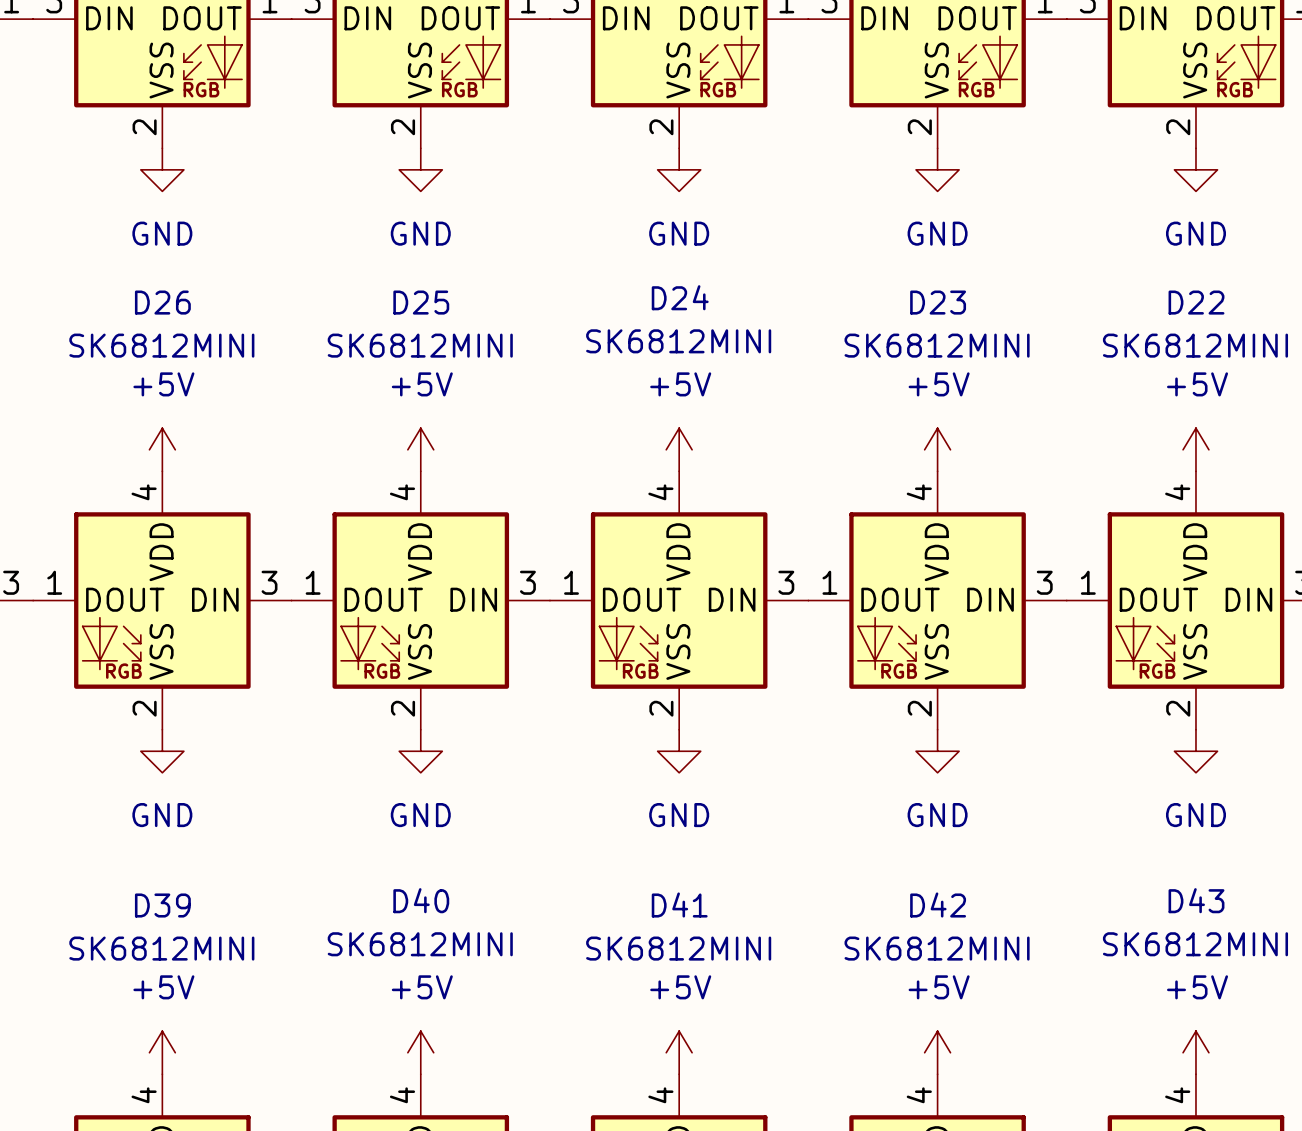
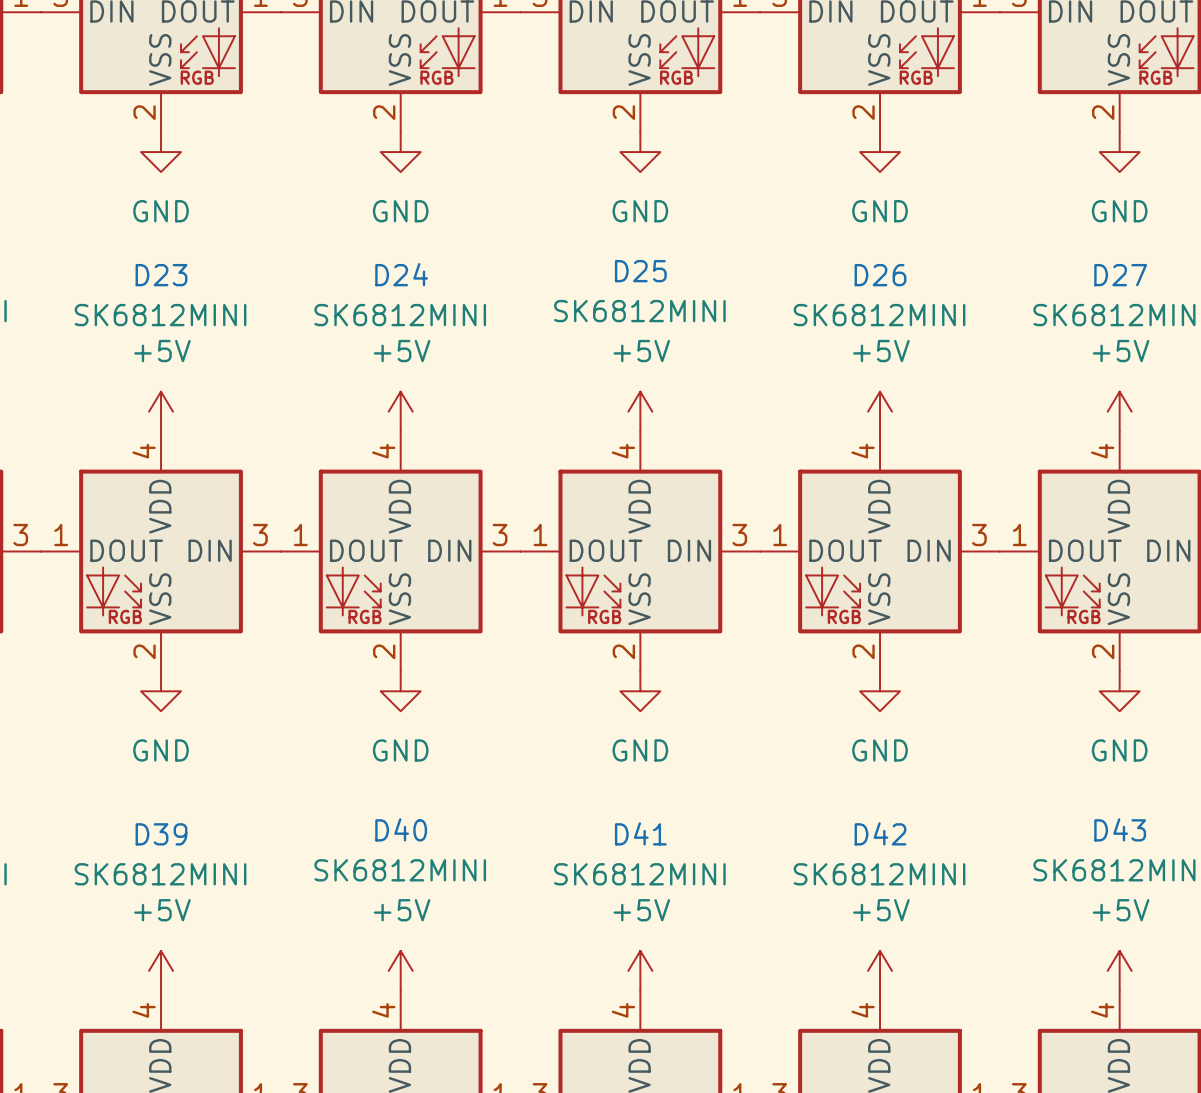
D24 name: D24 (680, 297) -> D25 (640, 271)
D26 name: D26 (162, 302) -> D23 (161, 275)
D25 name: D25 (421, 302) -> D24 (401, 274)
D23 name: D23 (938, 302) -> D26 (880, 275)
D22 name: D22 (1196, 302) -> D27 (1120, 275)

